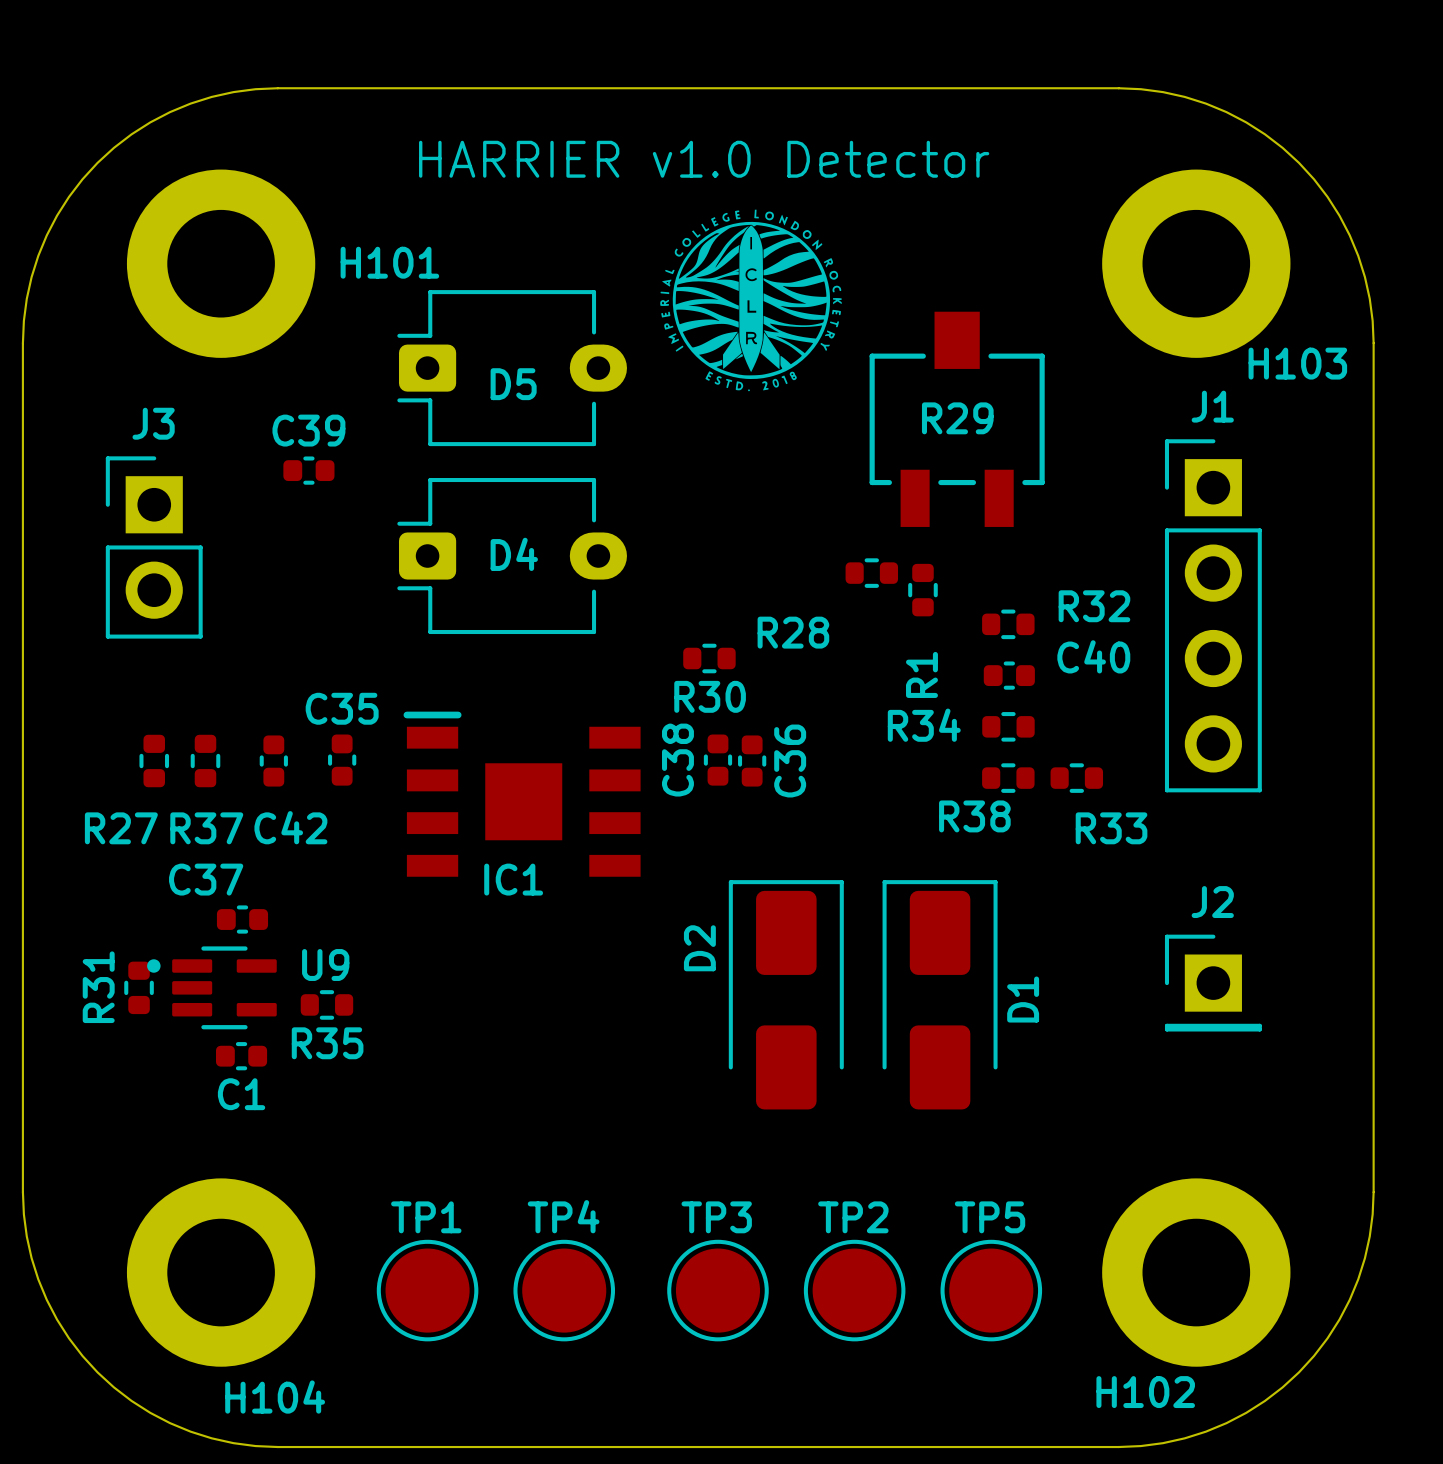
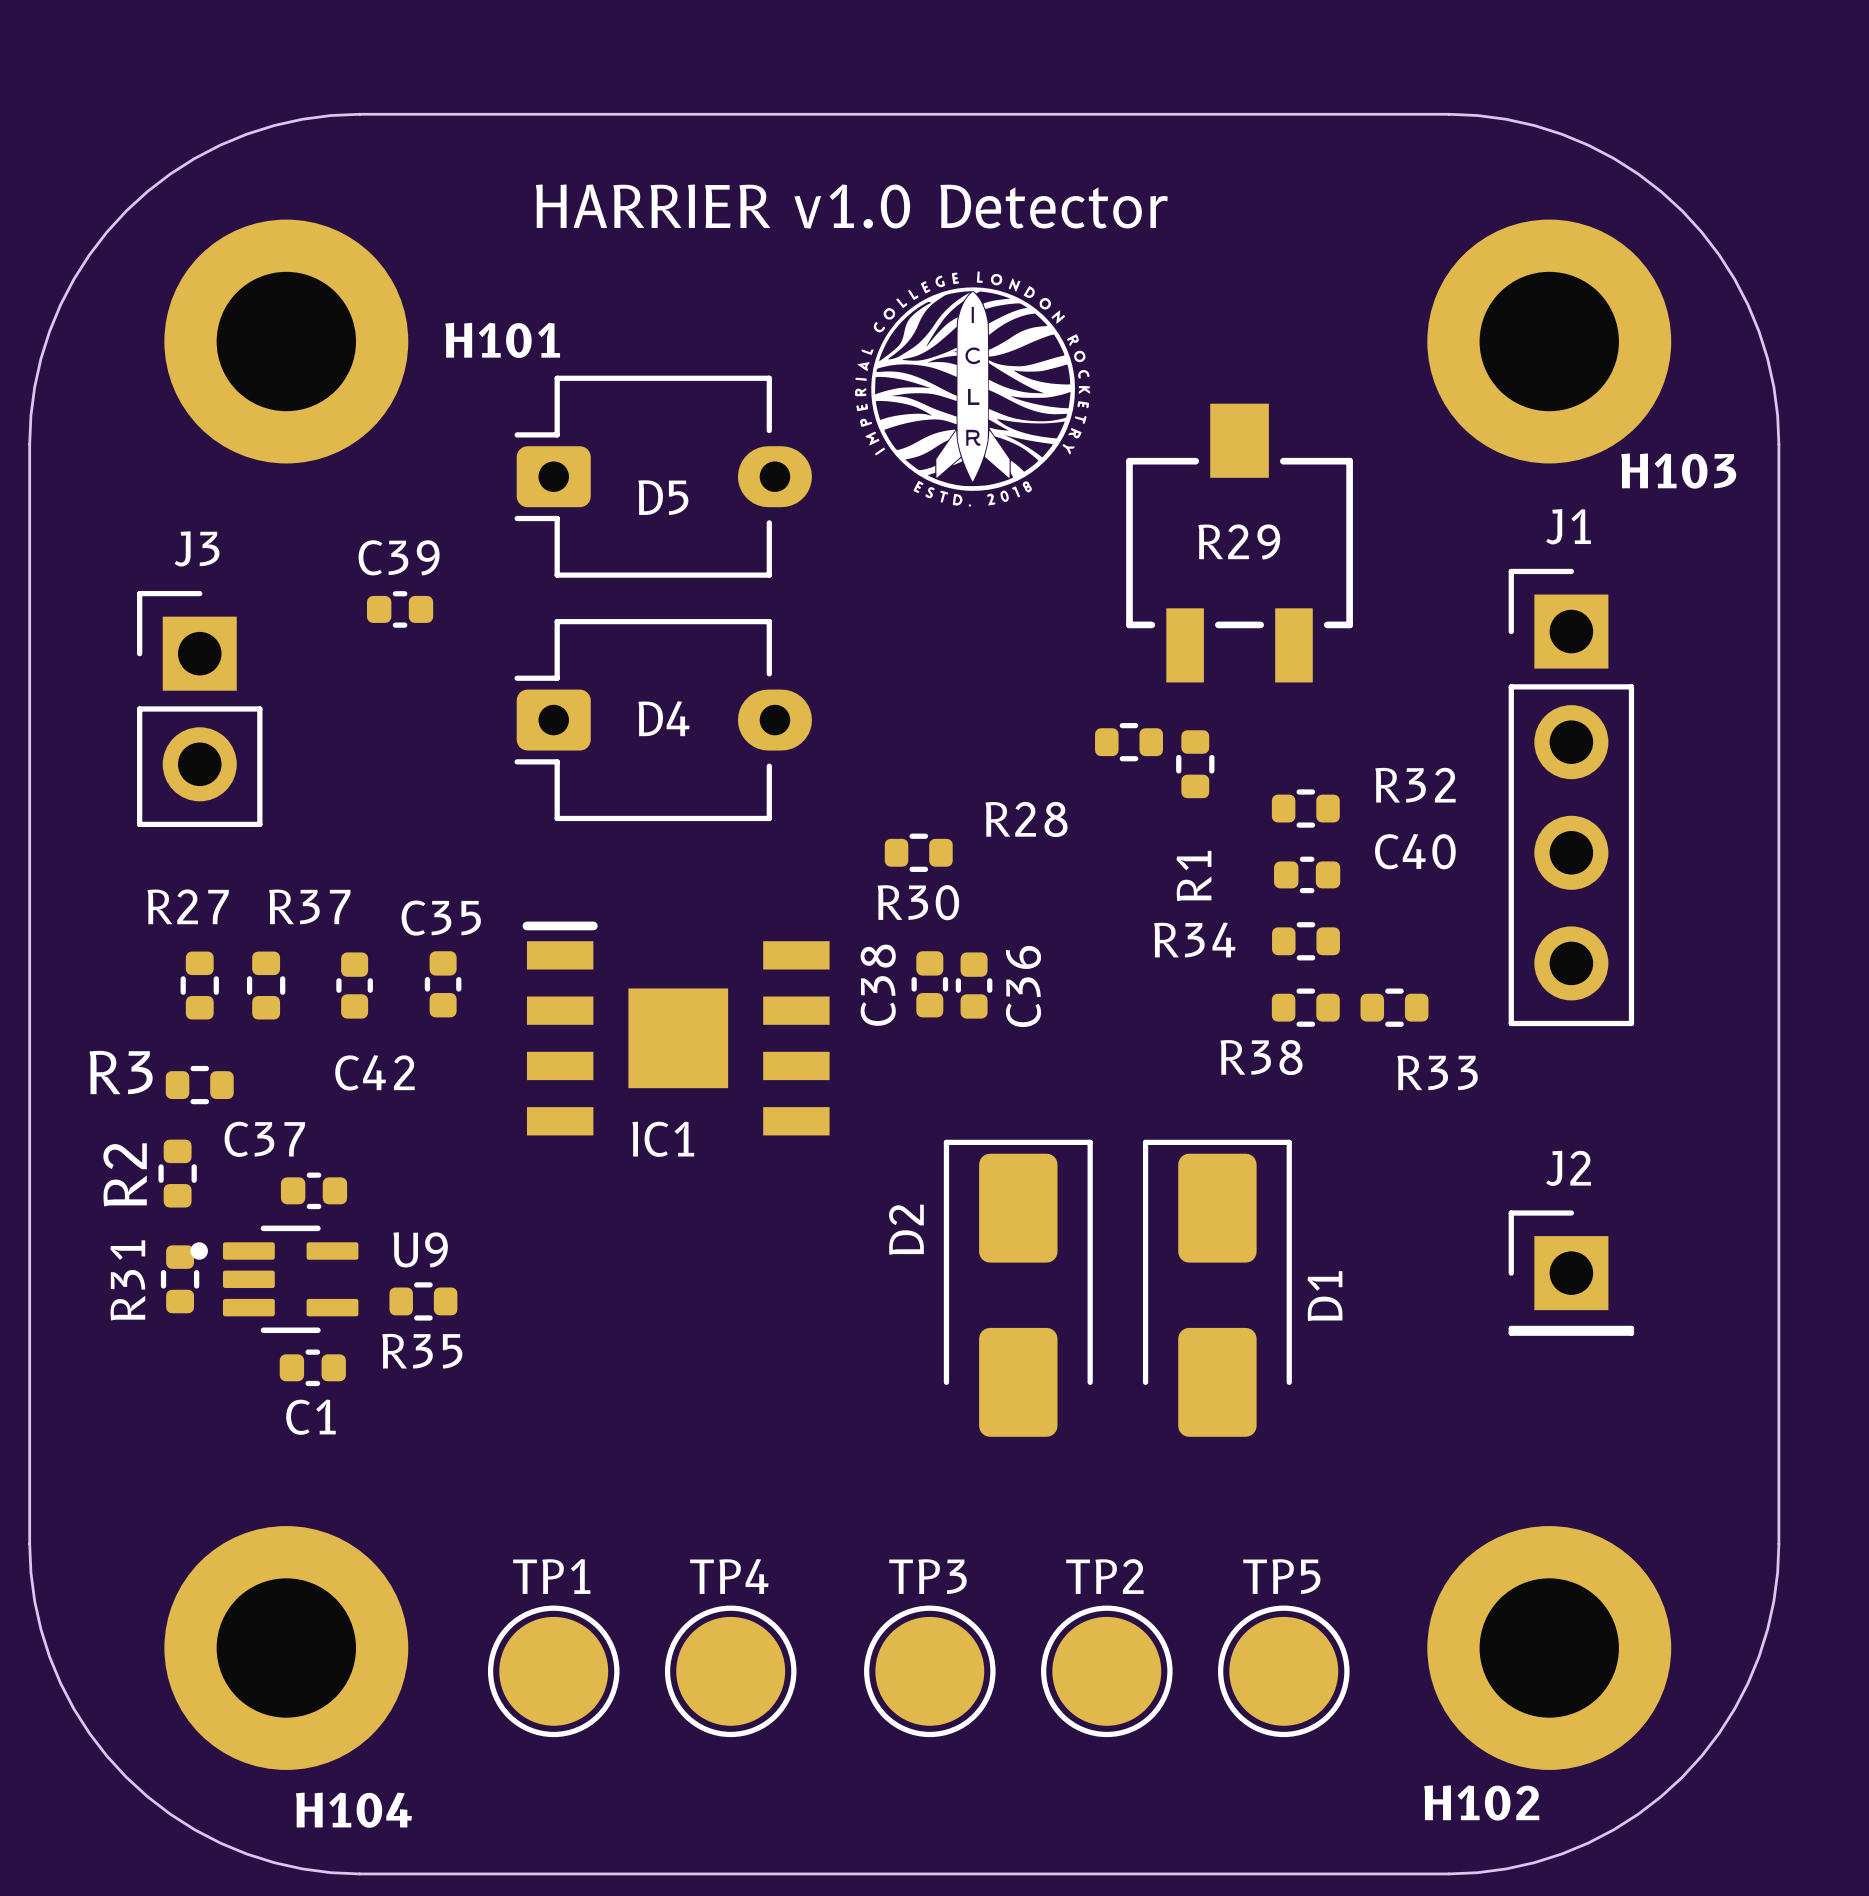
R27 name position: R27 (121, 828) -> R27 (188, 906)
R37 name position: R37 (206, 828) -> R37 (309, 906)
R3: none -> (199, 1085)
R2: none -> (177, 1173)

